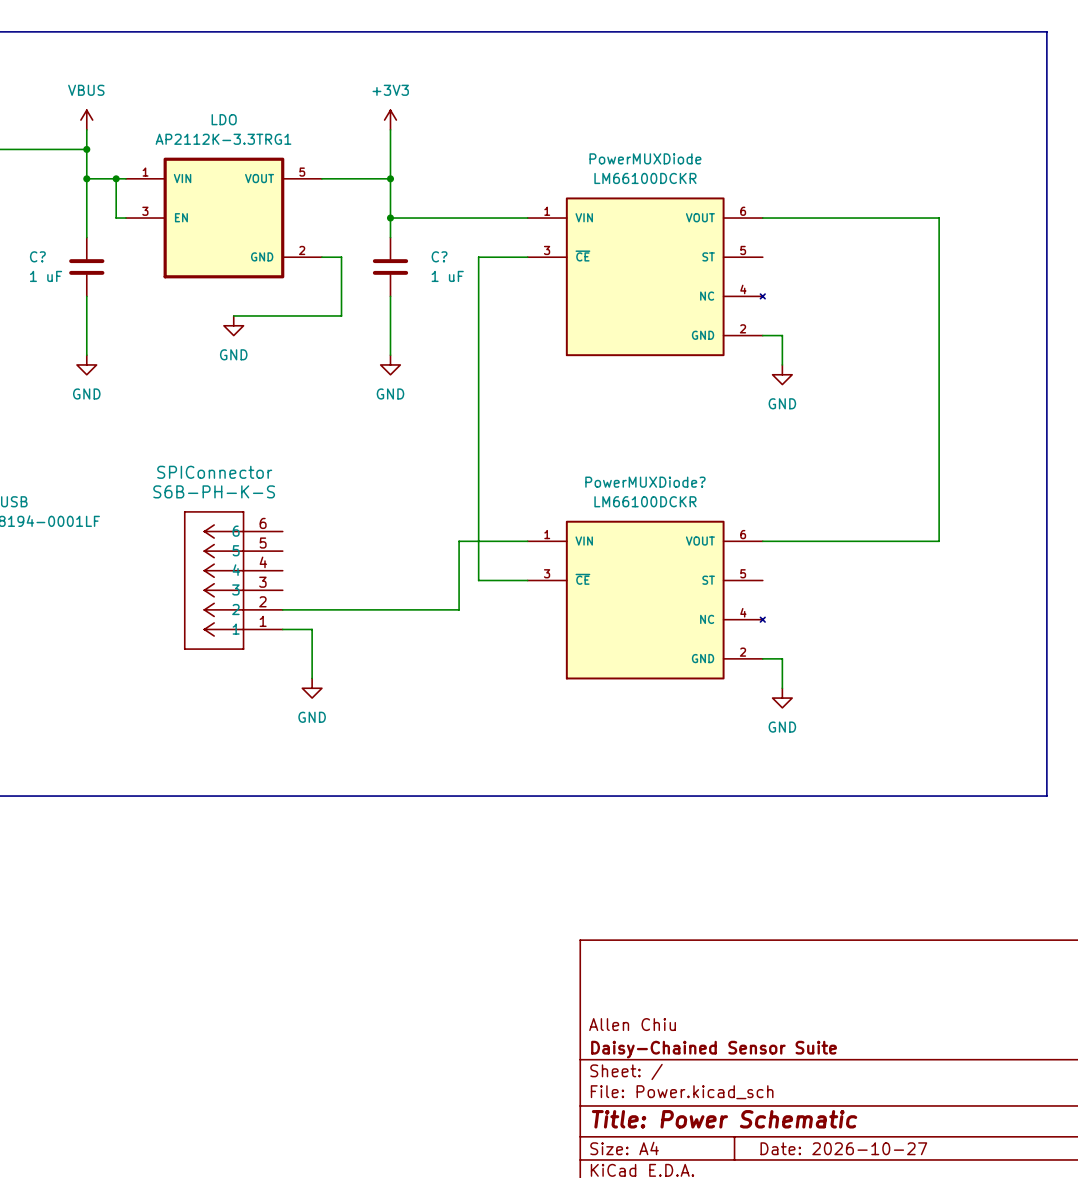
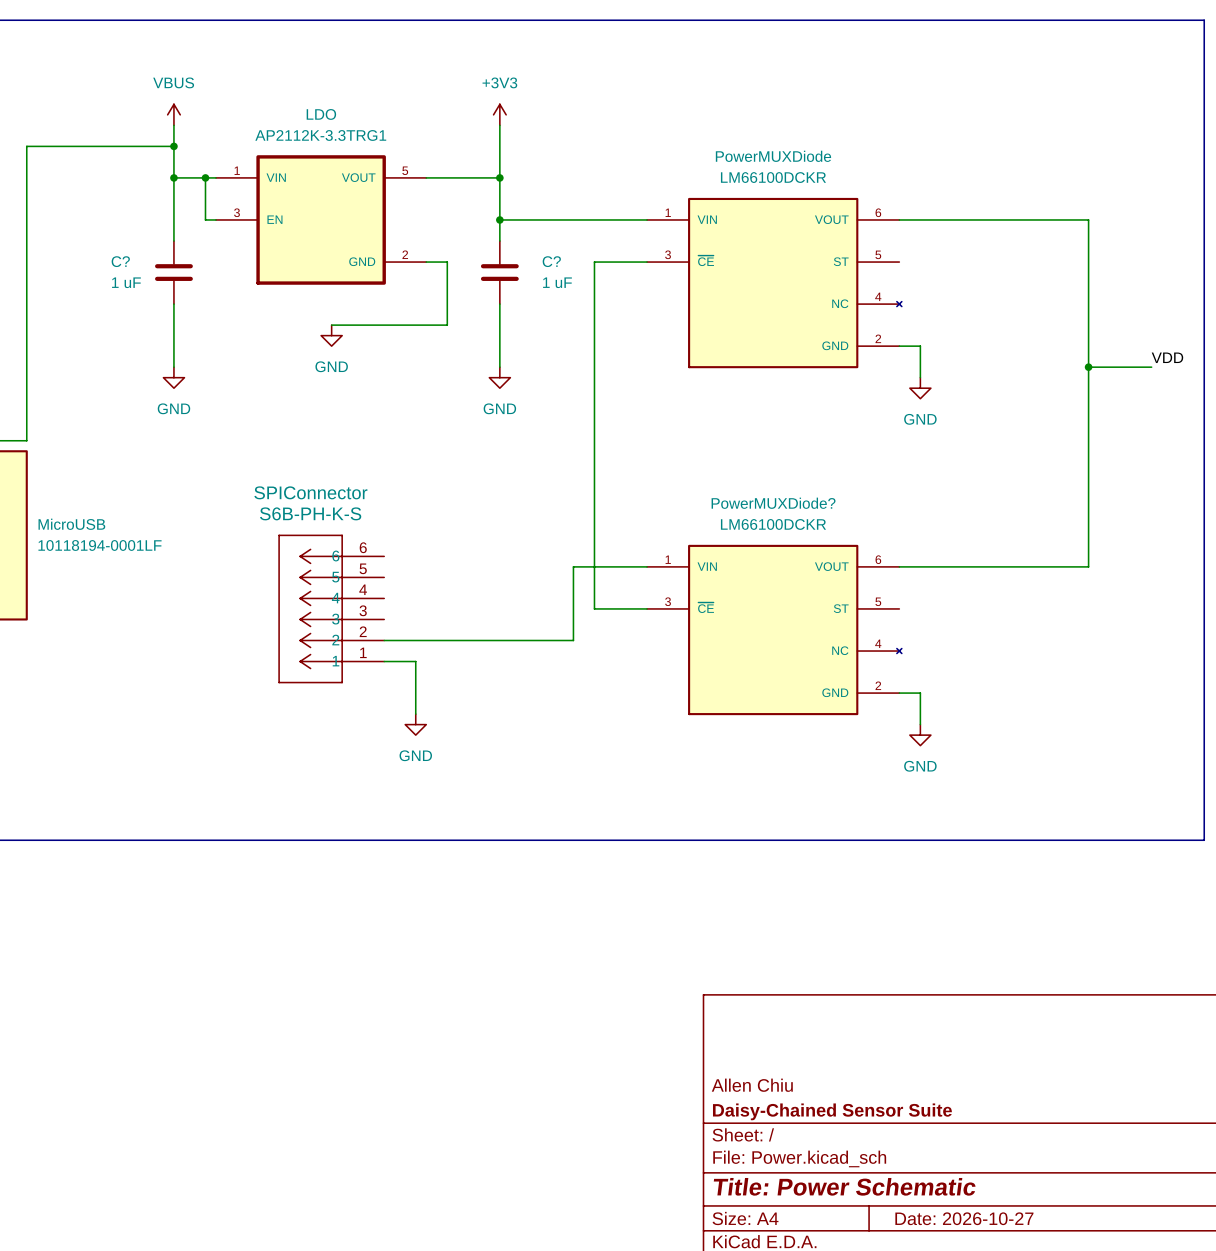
label: none -> VDD (1167, 357)
wire: none -> (1088, 367) (1151, 367)
junction: none -> (1088, 367)

